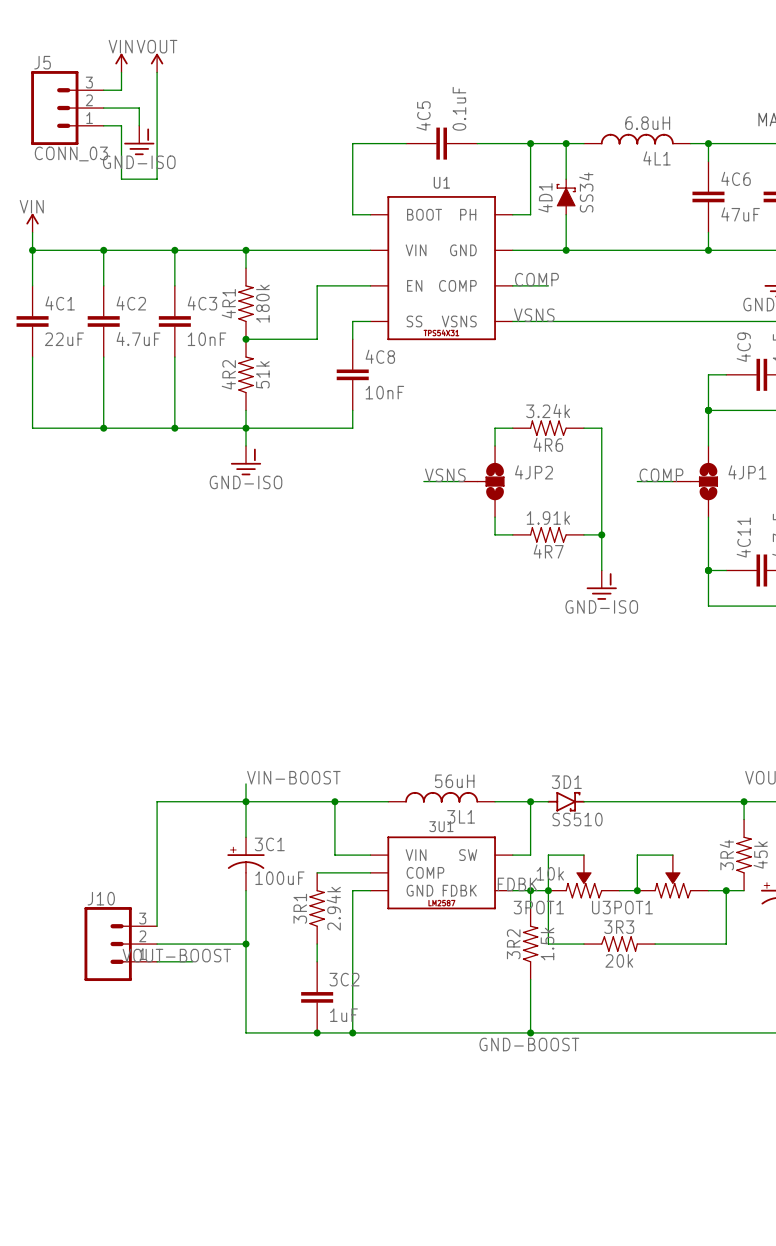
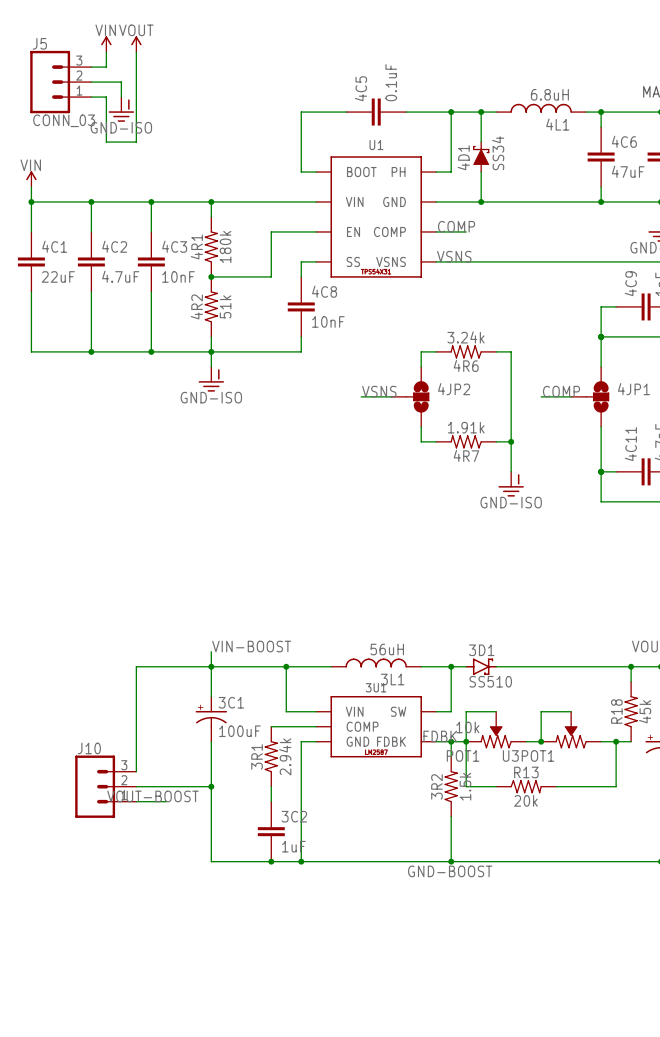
3R4 name: 3R4 (726, 855) -> R18 (616, 711)
3POT1 name: 3POT1 (538, 907) -> POT1 (463, 755)
3R3 name: 3R3 (619, 927) -> R13 (526, 772)

